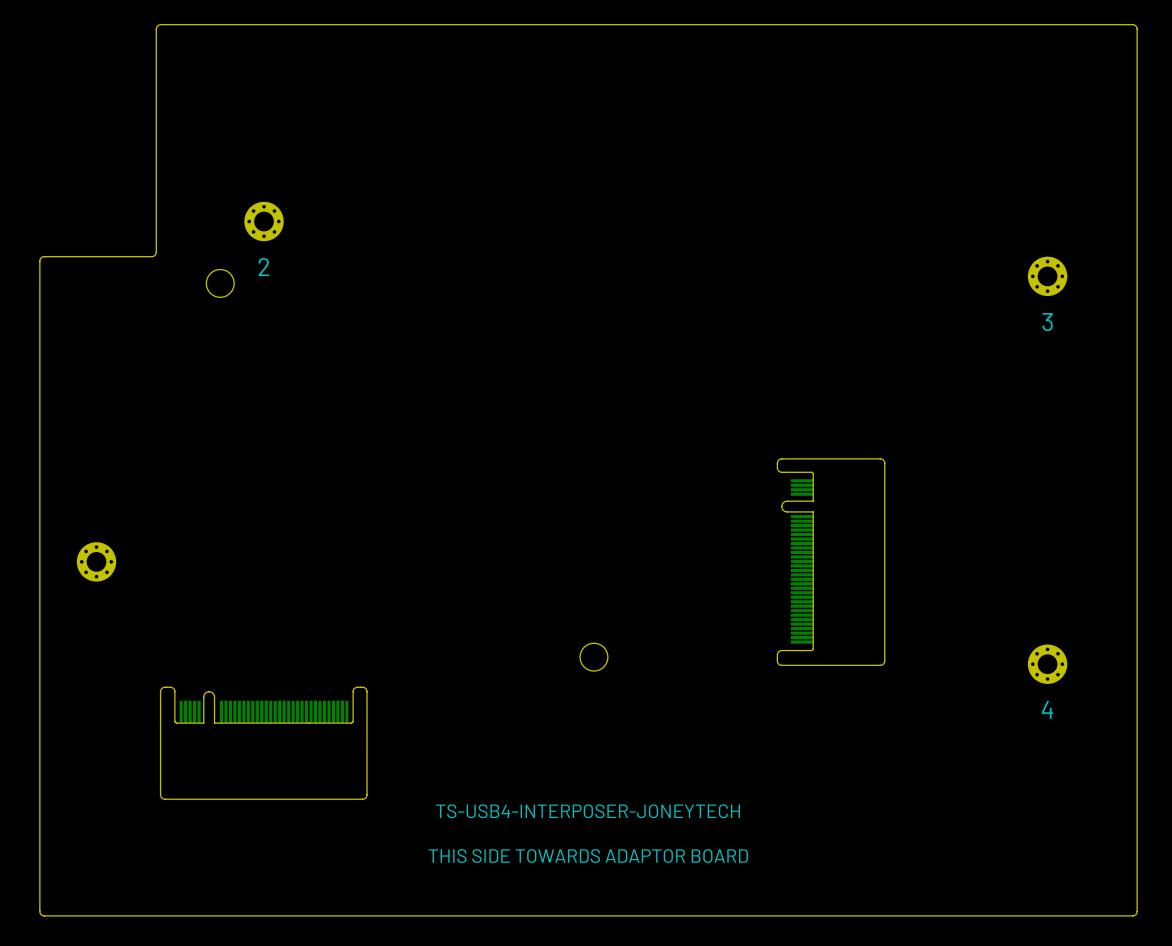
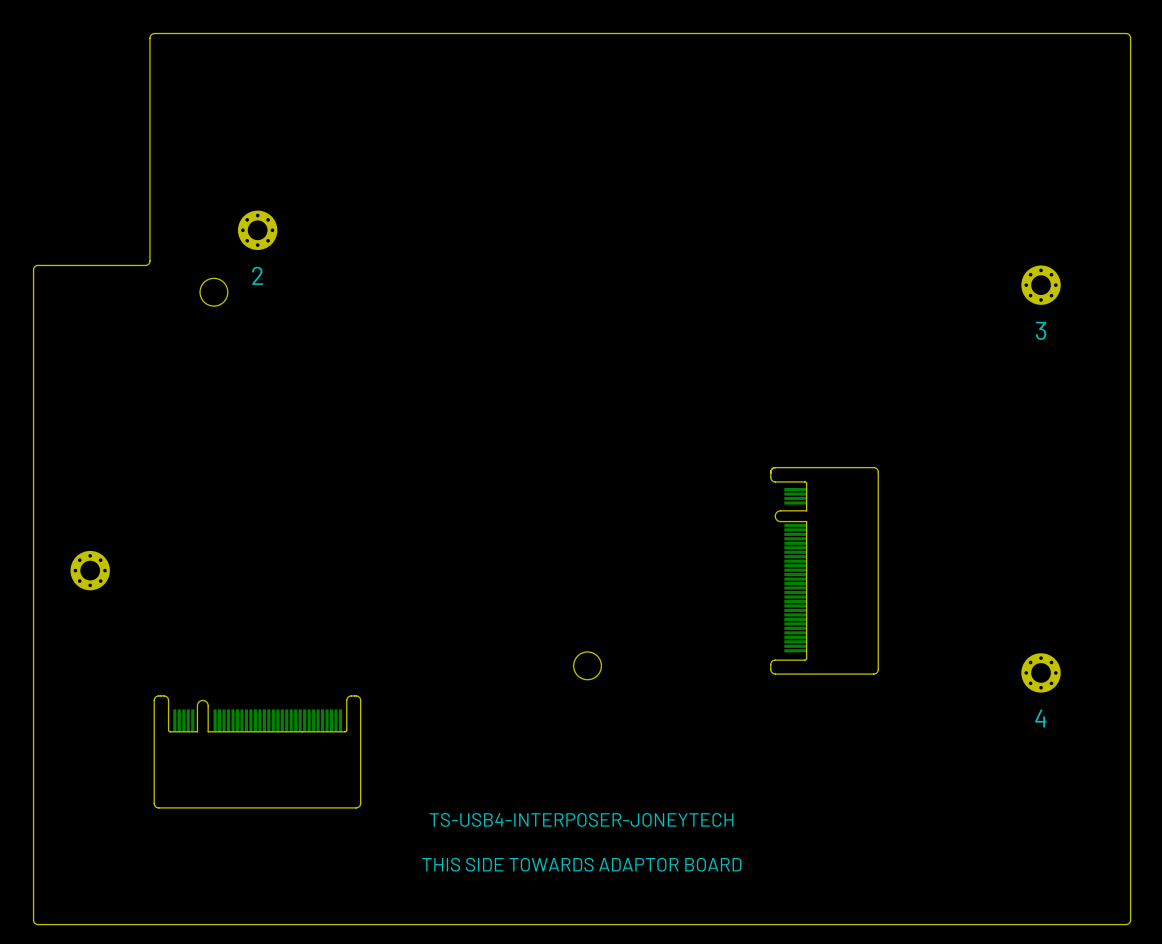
part footprint: [777, 464, 814, 659] -> [784, 487, 807, 653]
board edge: (777, 658) (777, 663) (781, 665) -> (775, 467) (770, 471) (770, 478) (773, 481) (805, 481) (806, 483) (806, 510) (779, 510) (775, 516) (779, 521) (806, 521) (806, 658) (773, 660) (770, 663) (770, 670) (775, 674)

